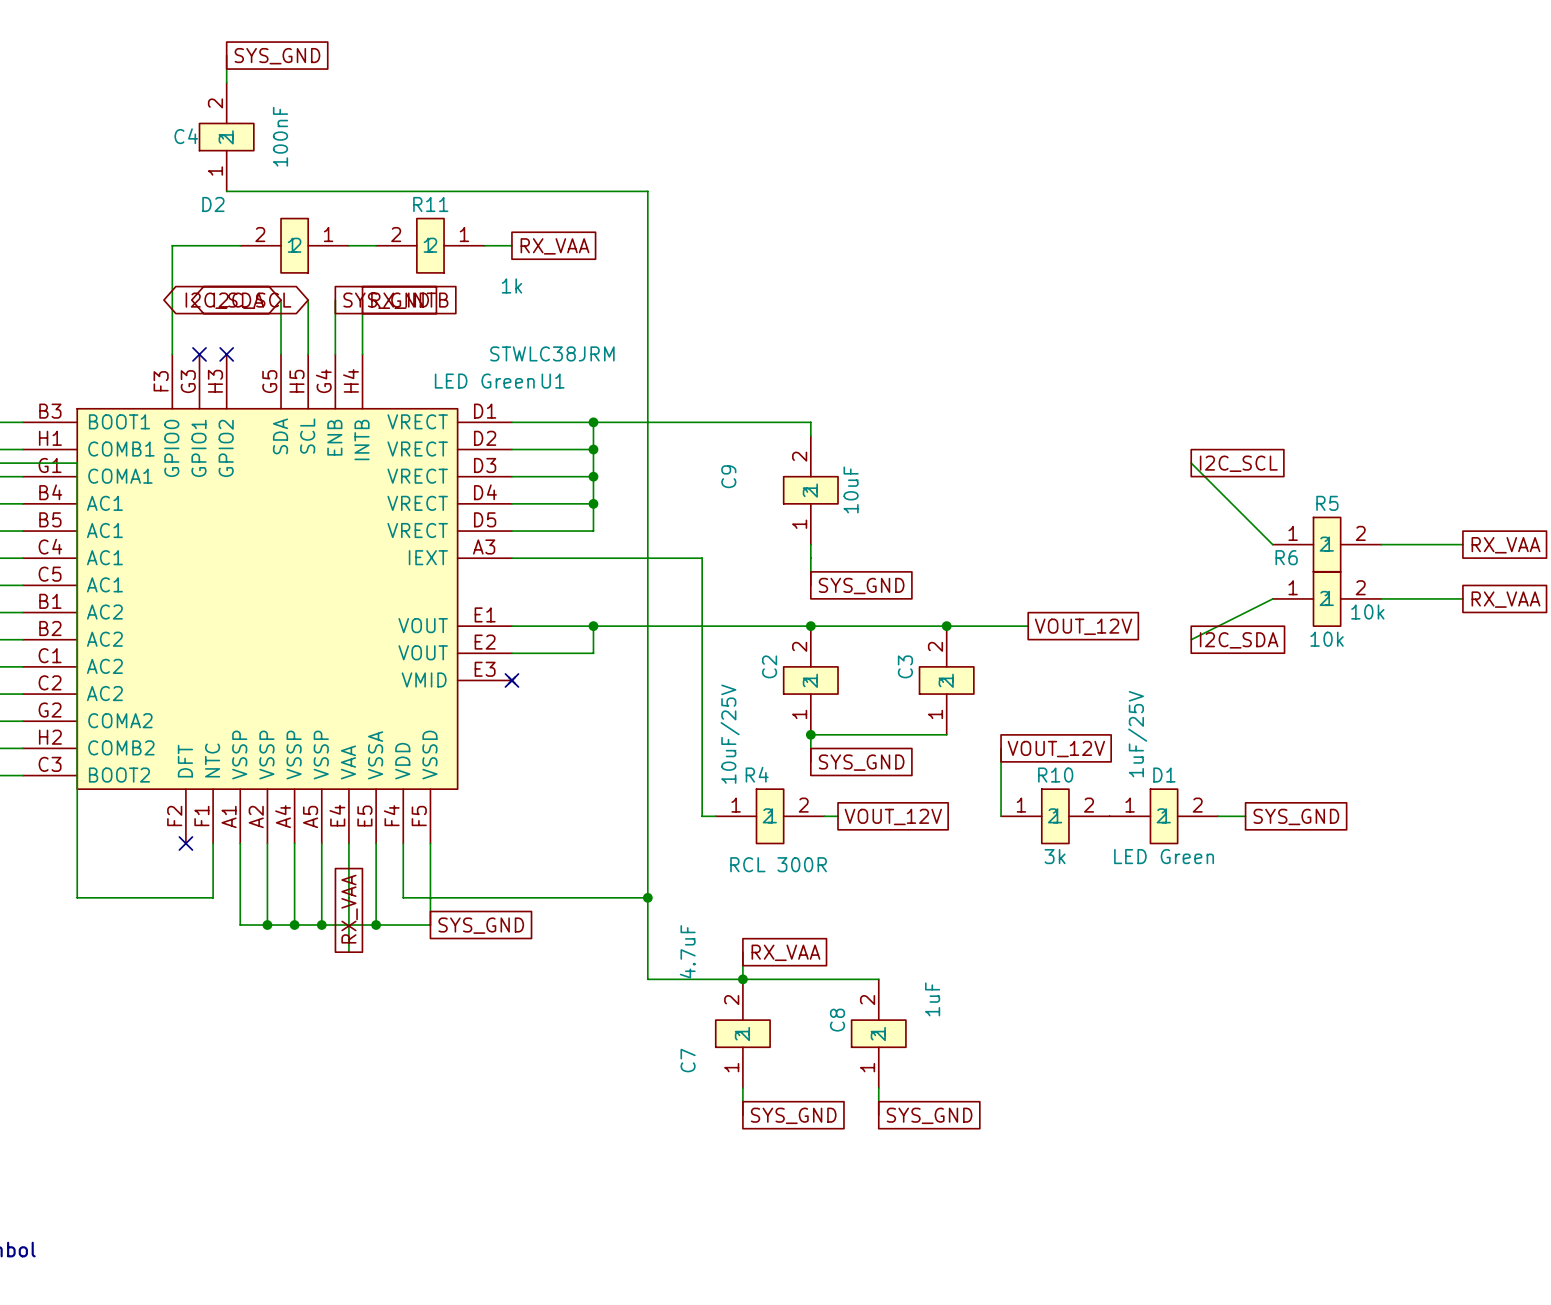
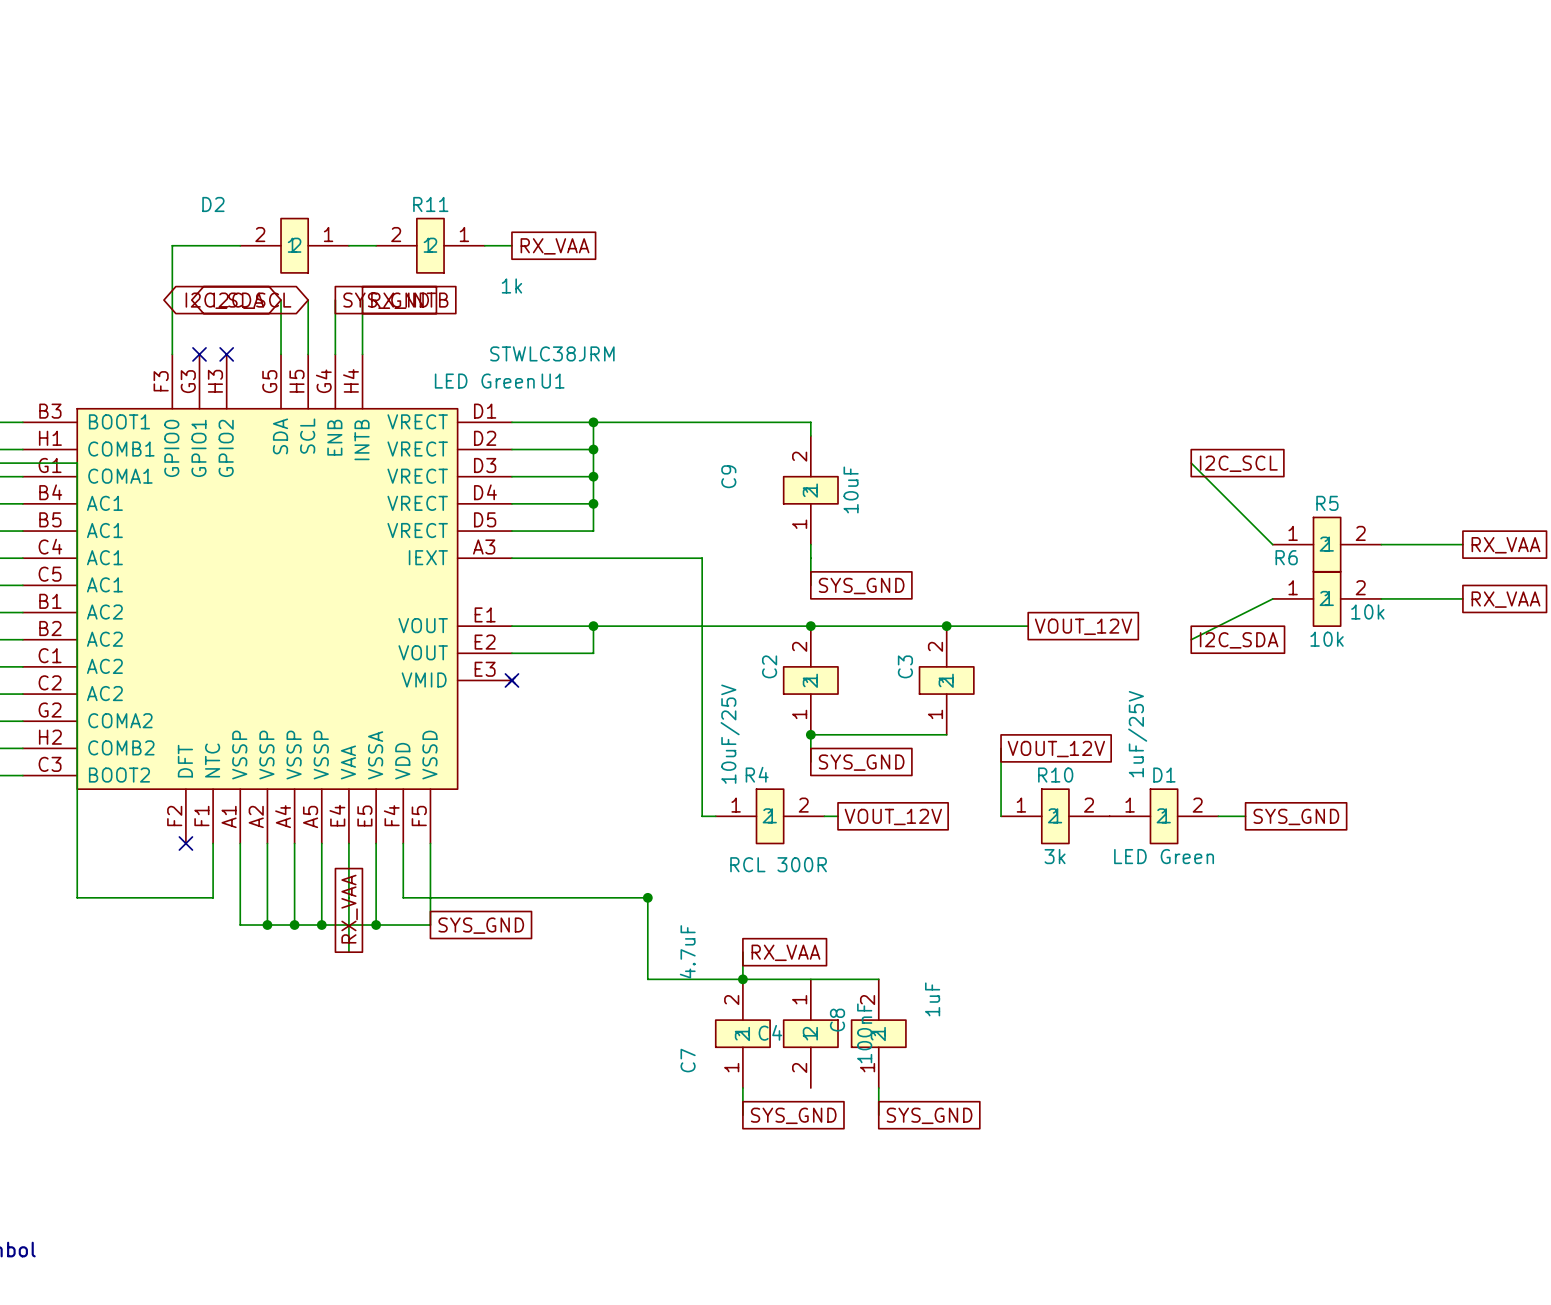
wire: (226, 55) (226, 82) -> none
global label: SYS_GND (277, 56) -> none
C4 rotation: 0° (226, 137) -> 180° (810, 1033)
C4 position: (226, 137) -> (810, 1033)
wire: (226, 191) (647, 191) (647, 897) -> none

